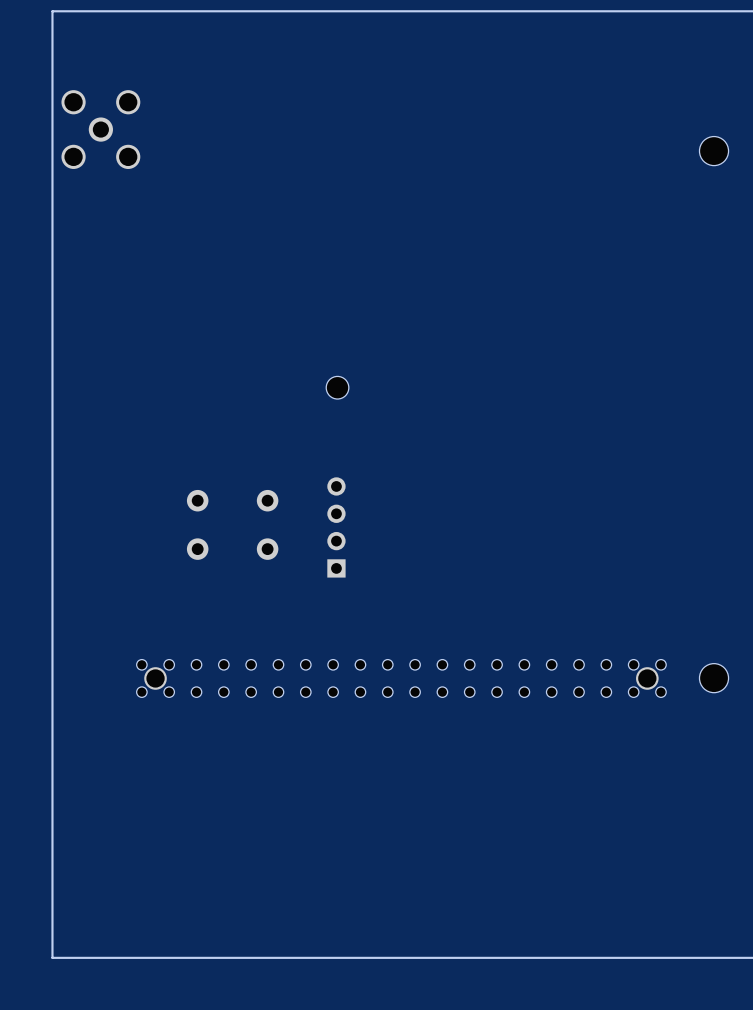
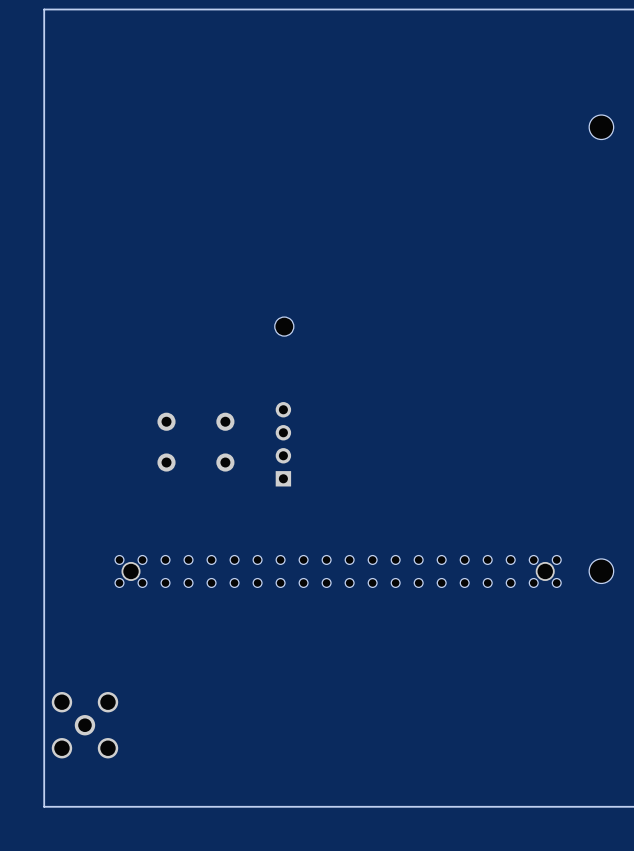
part: (100, 129) -> none
part: none -> (84, 725)

